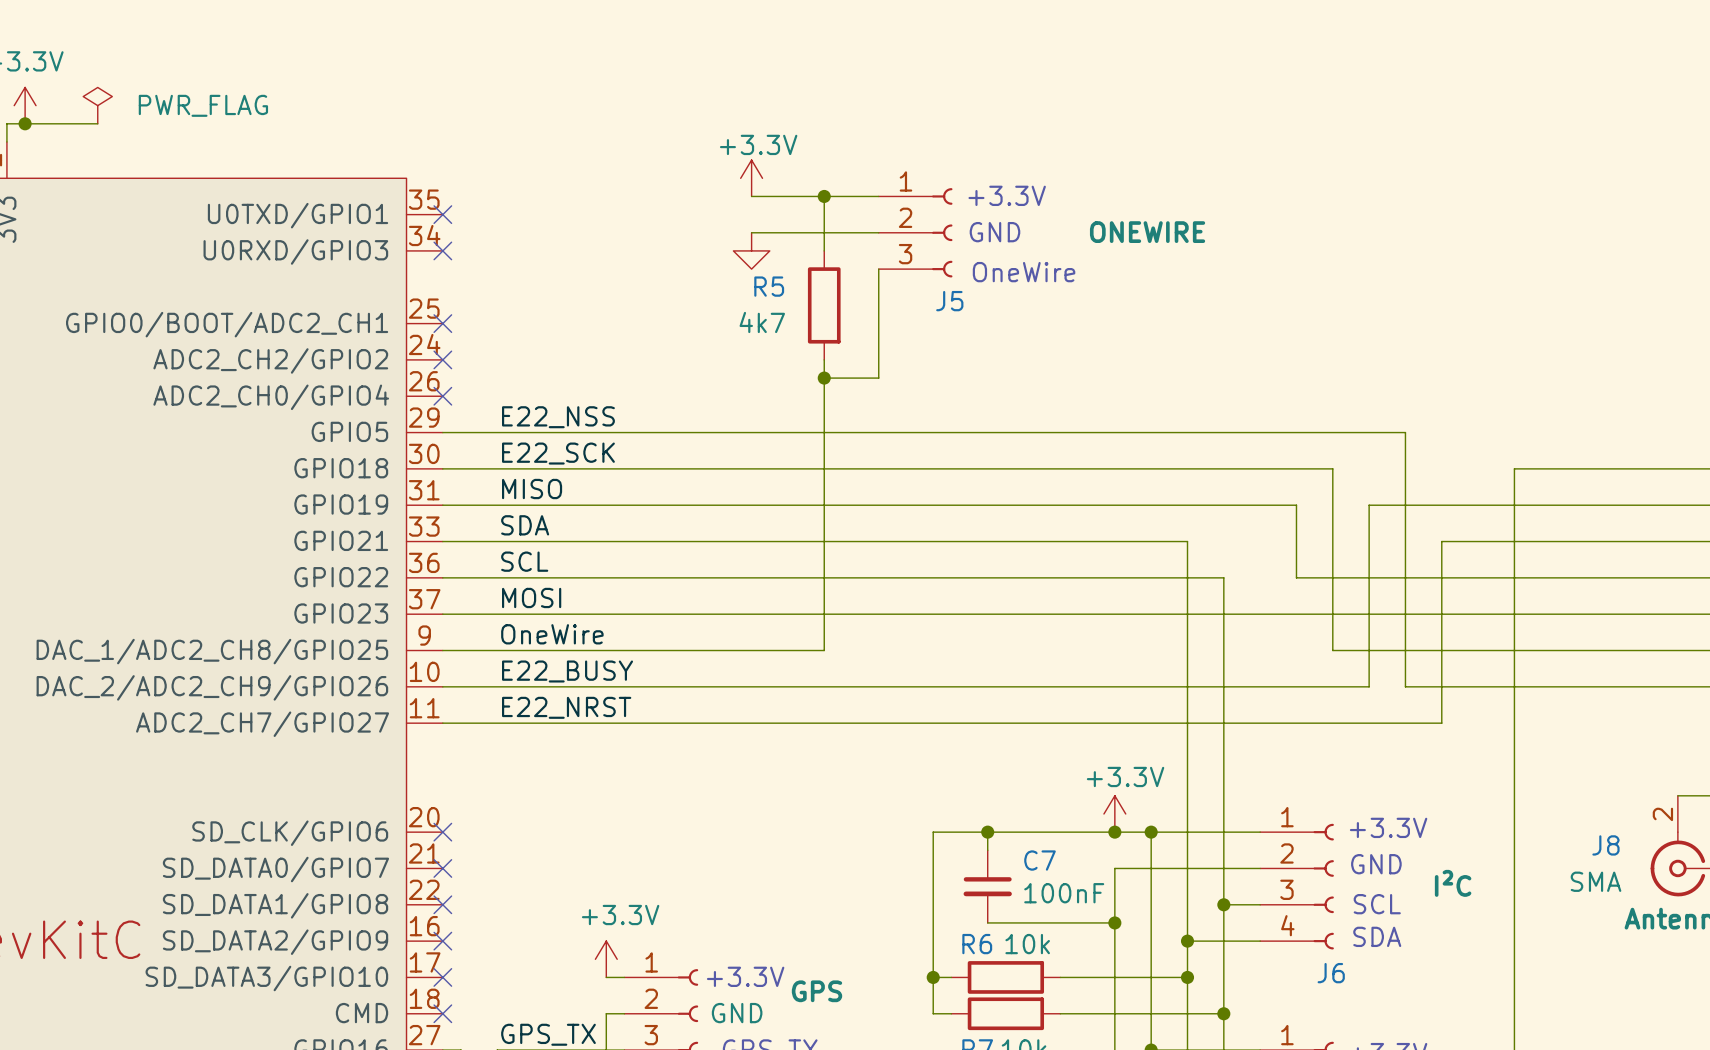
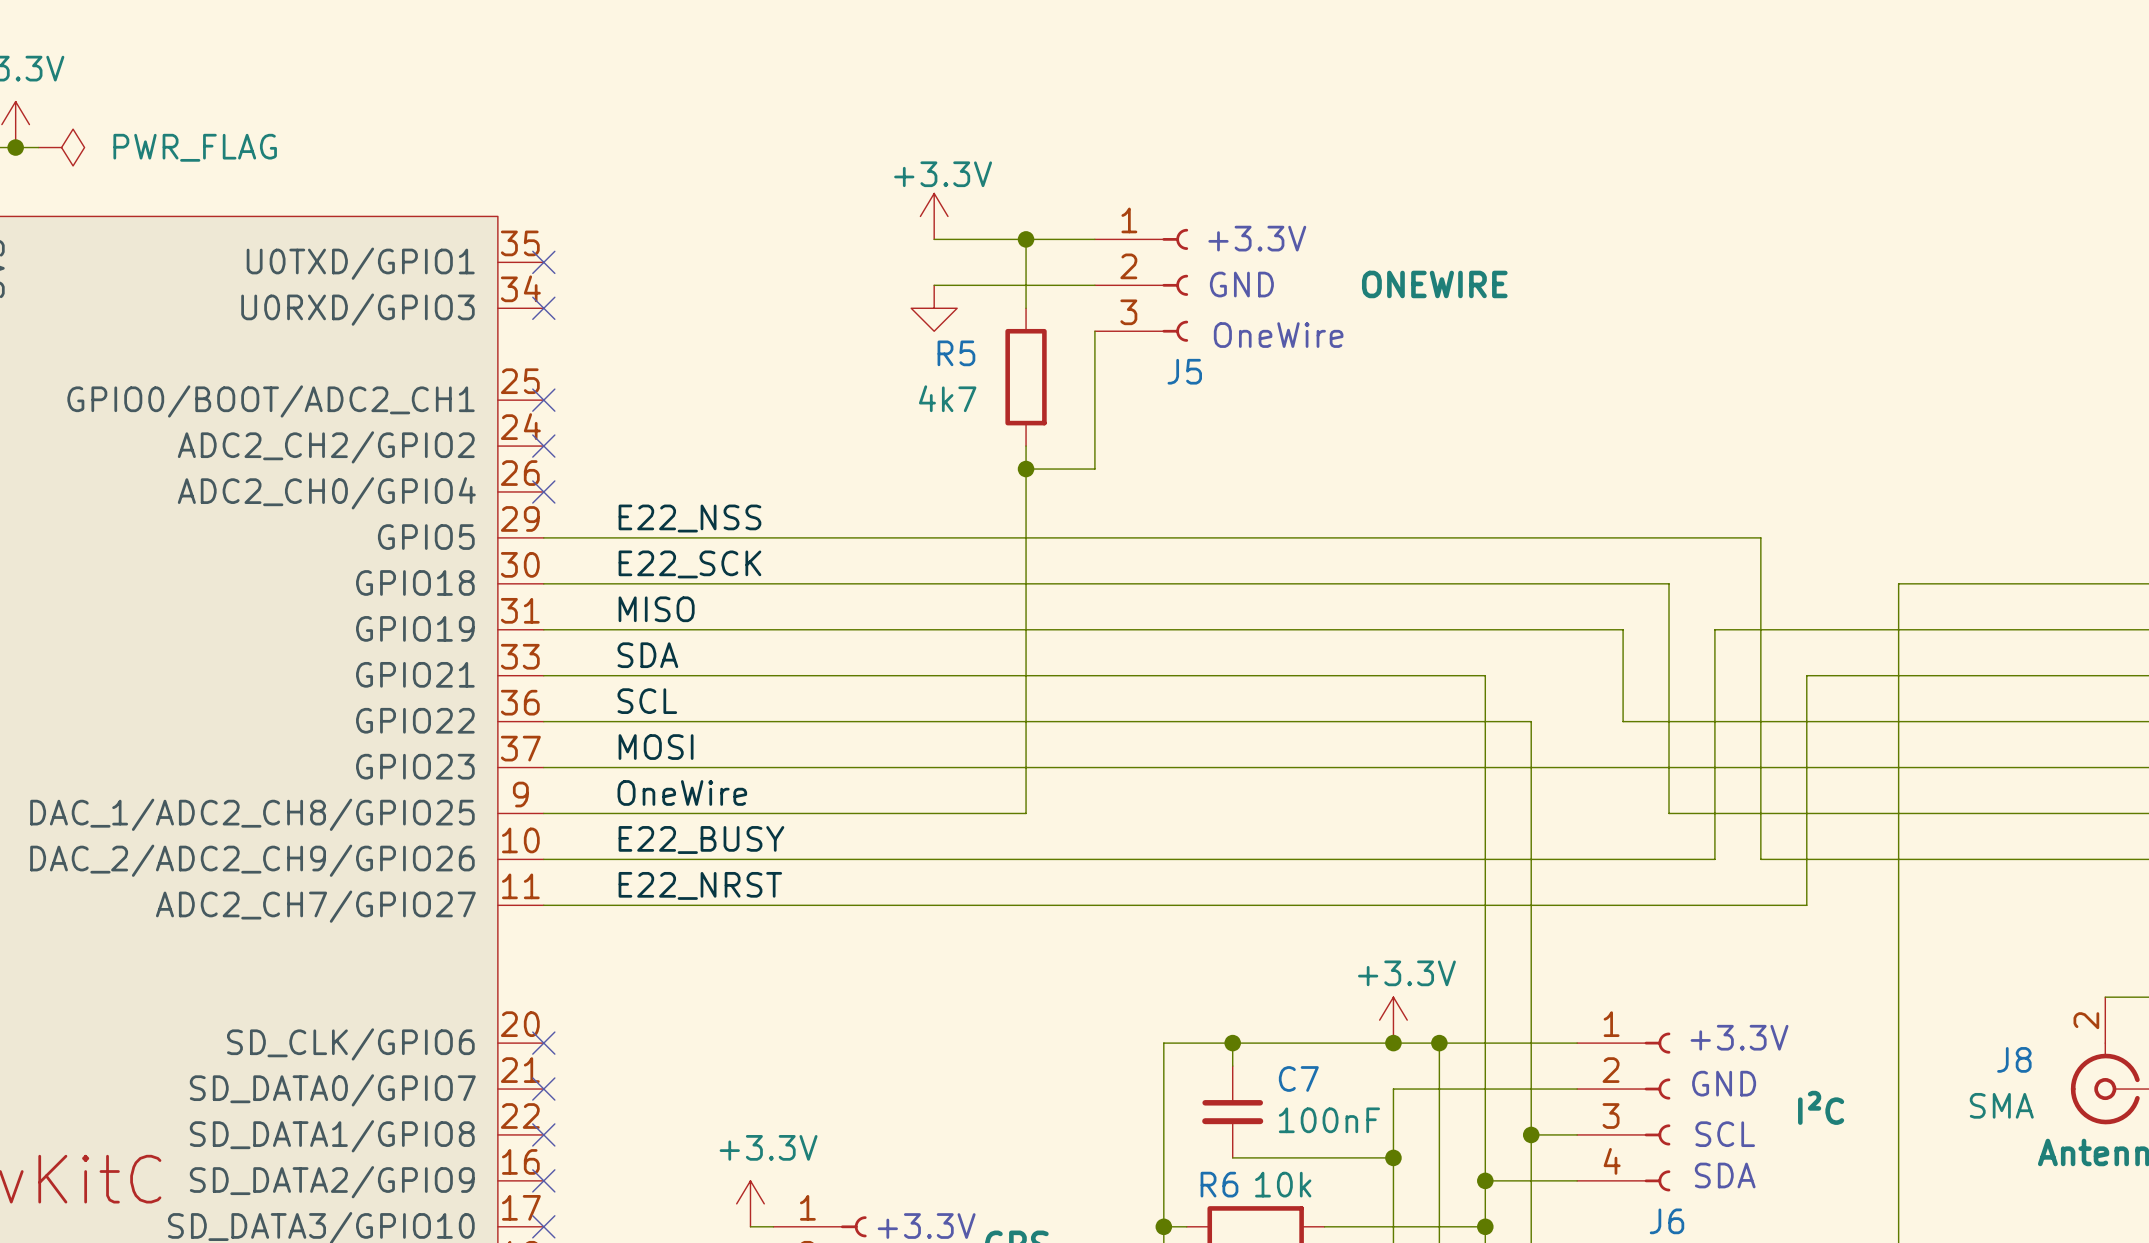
power symbol rotation: 0° (97, 105) -> 90° clockwise (61, 147)
power symbol position: PWR_FLAG (97, 105) -> PWR_FLAG (61, 147)
wire: (43, 123) (97, 123) -> none

